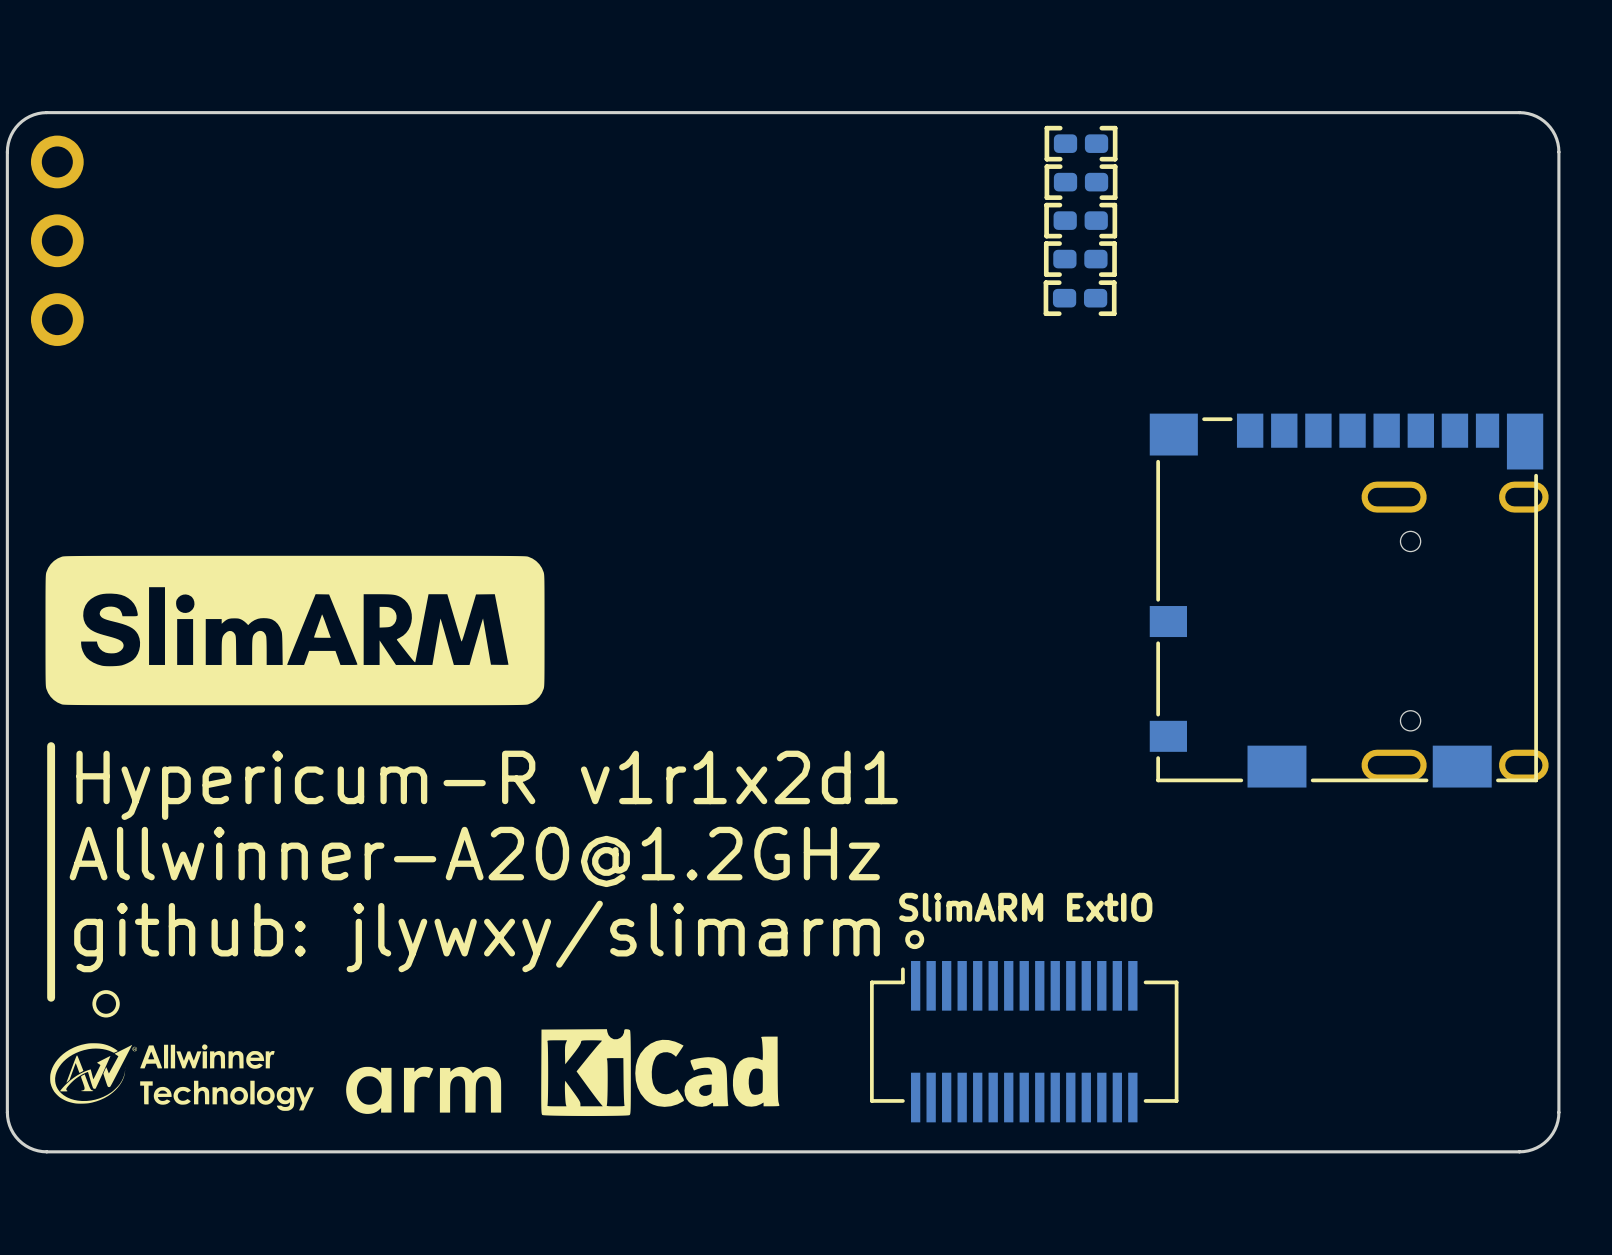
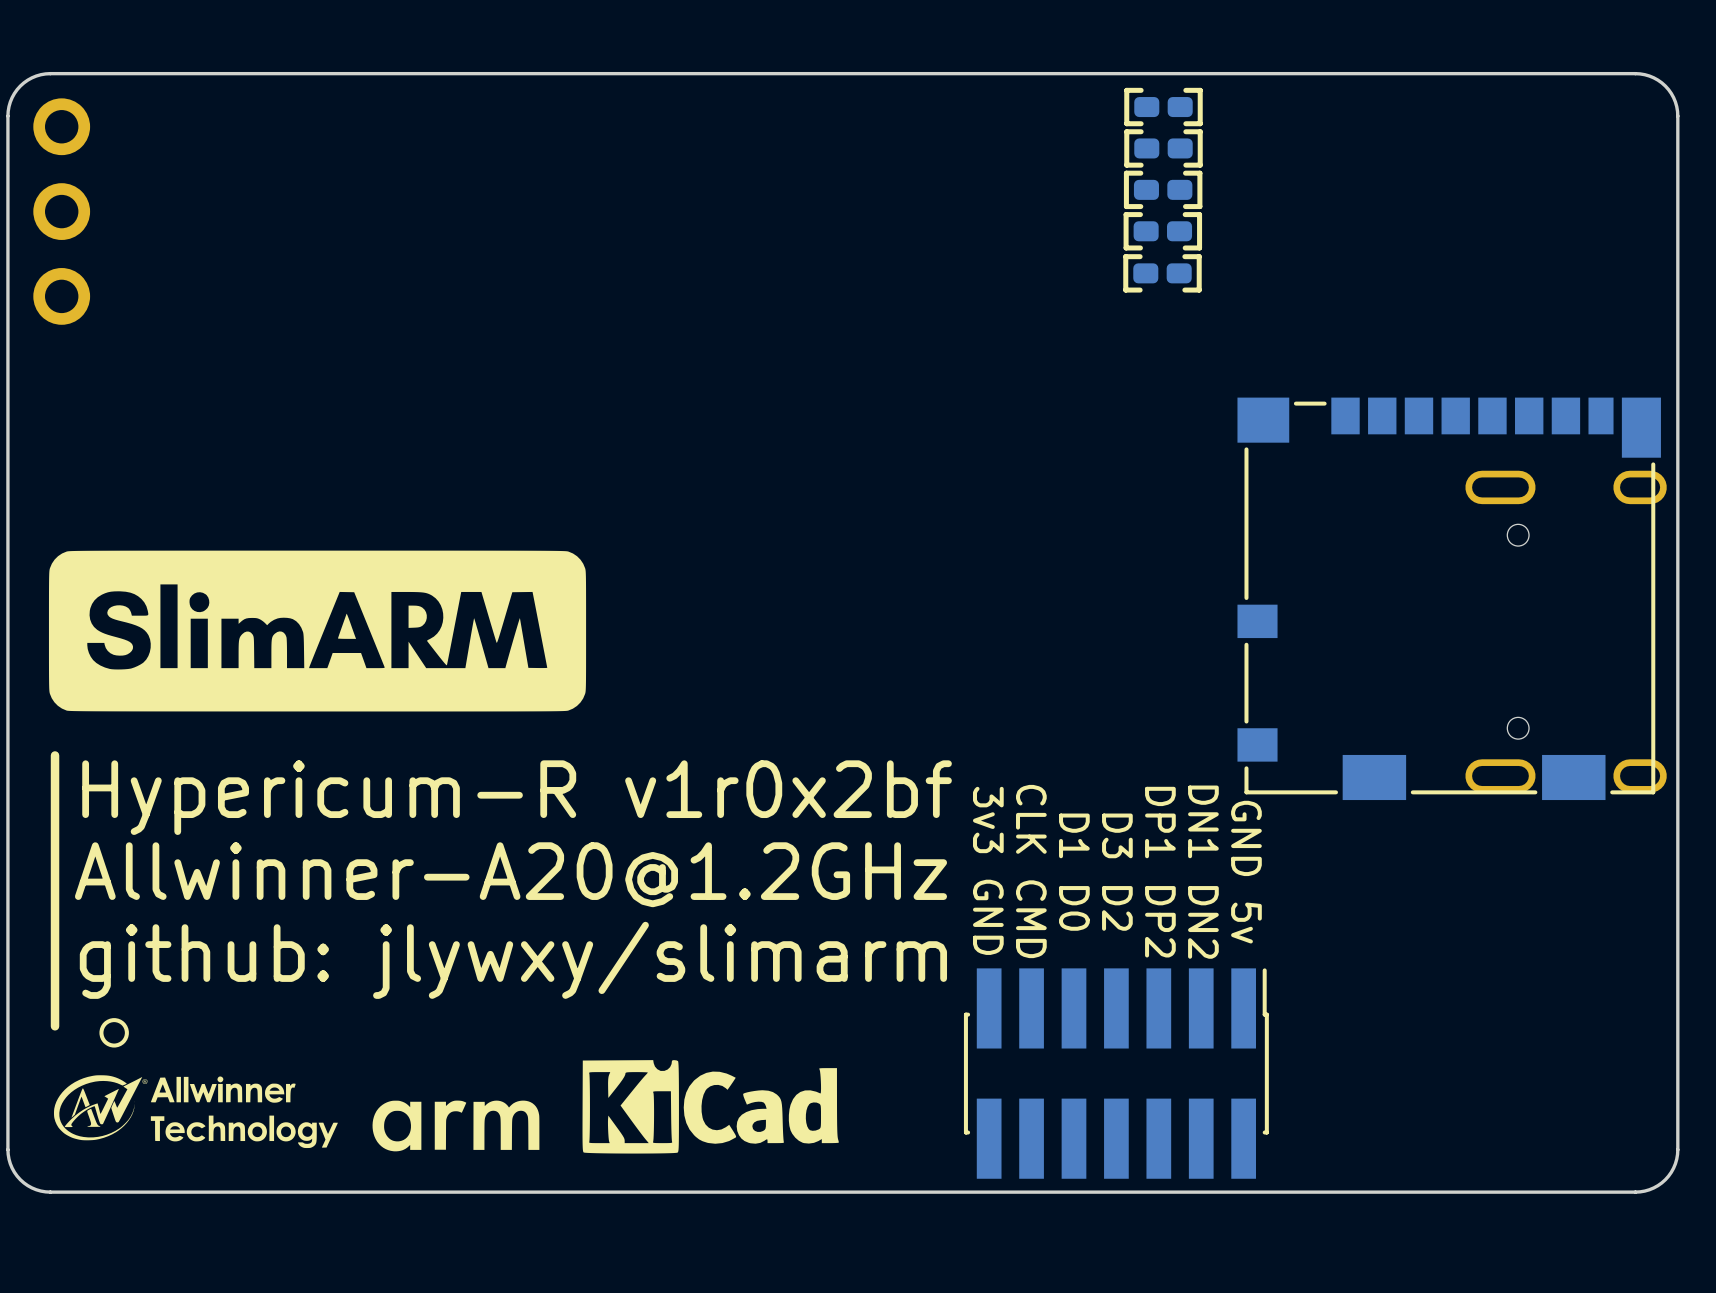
text: Hypericum-R v1r1x2d1 (487, 785) -> Hypericum-R v1r0x2bf (517, 797)
text: none -> 3v3 GND (988, 870)
text: none -> CLK CMD (1031, 871)
text: none -> D1 D0 (1074, 872)
text: none -> D3 D2 (1117, 872)
text: none -> DP1 DP2 (1160, 872)
text: none -> DN1 DN2 (1203, 872)
text: none -> GND 5v (1246, 872)
text: SlimARM ExtIO (1025, 907) -> none
drawing: [905, 930, 925, 950] -> none
part footprint: [870, 961, 1179, 1123] -> [963, 968, 1269, 1179]

